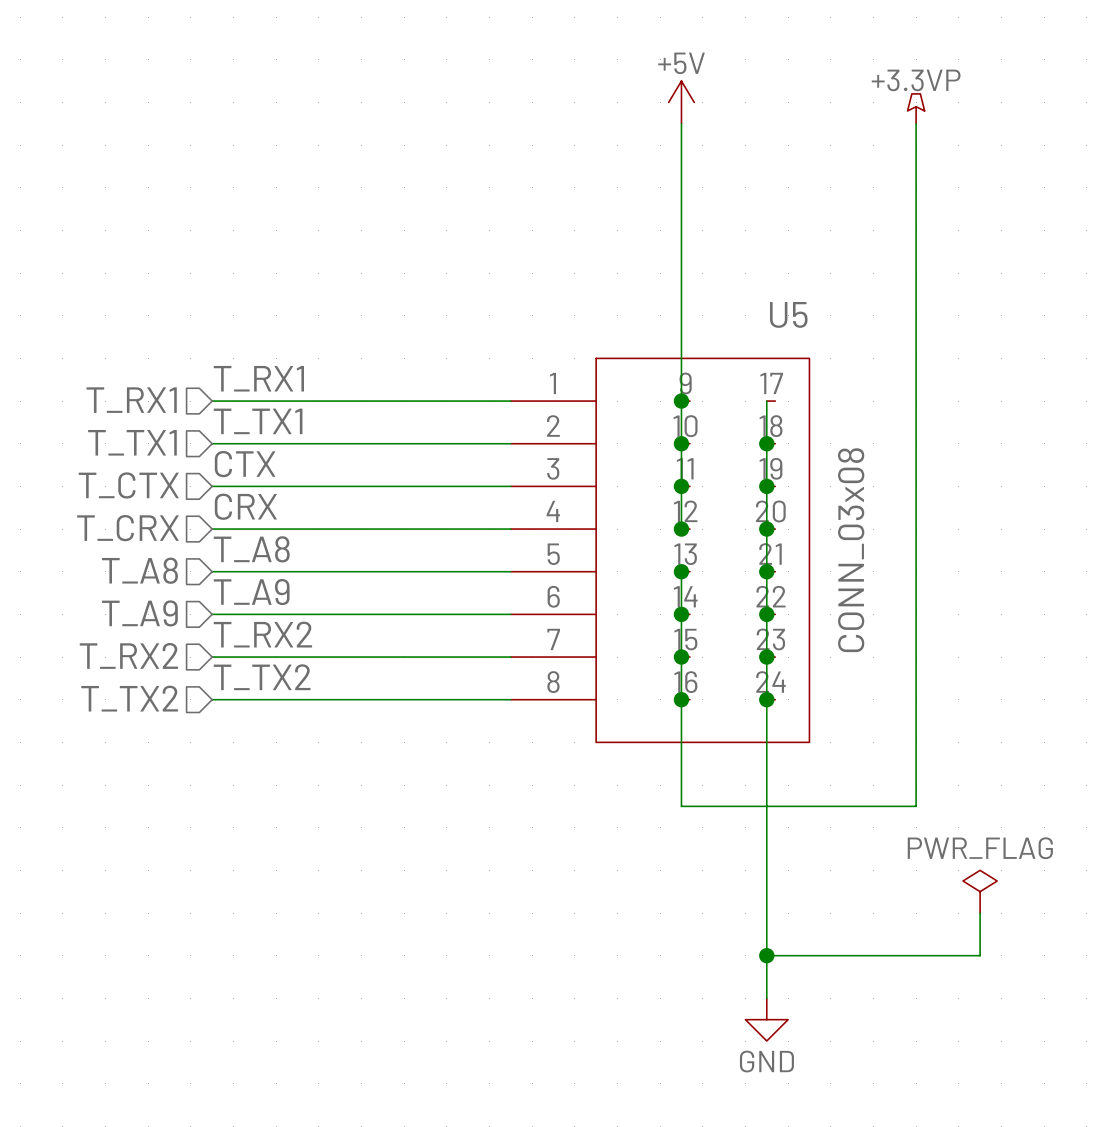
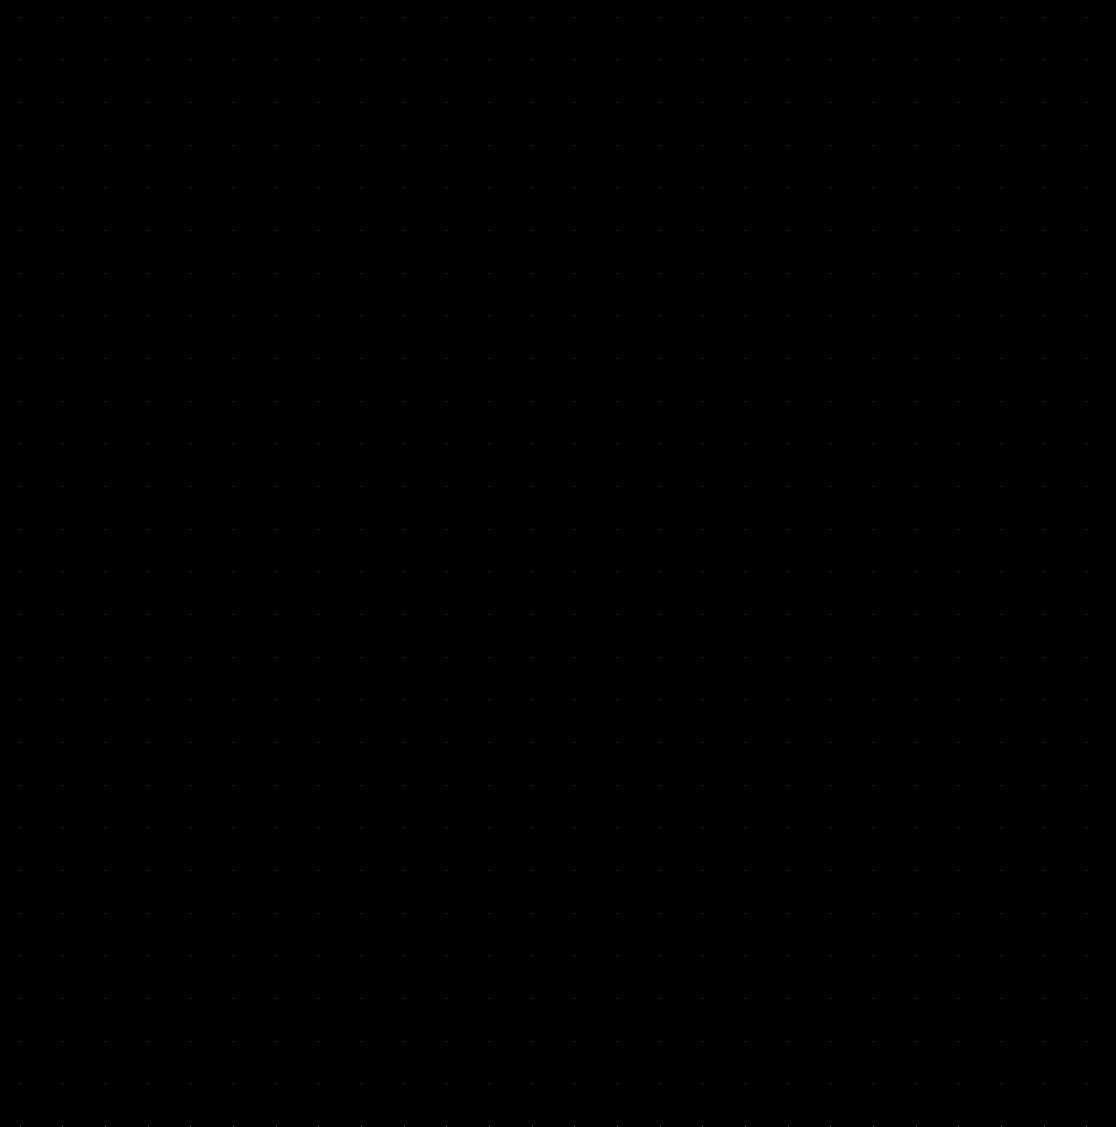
power symbol: +5V (681, 102) -> none
power symbol: +3.3VP (916, 108) -> none
wire: (681, 123) (681, 529) -> none
wire: (916, 123) (916, 806) (681, 806) (681, 571) -> none
label: T_RX1 (258, 378) -> none
hierarchical label: T_RX1 (131, 400) -> none
wire: (212, 401) (510, 401) -> none
junction: (681, 401) -> none
wire: (766, 401) (766, 998) -> none
label: T_TX1 (258, 421) -> none
hierarchical label: T_TX1 (132, 442) -> none
wire: (212, 443) (510, 443) -> none
junction: (681, 443) -> none
junction: (766, 443) -> none
label: CTX (245, 464) -> none
hierarchical label: T_CTX (128, 485) -> none
wire: (212, 486) (510, 486) -> none
junction: (681, 486) -> none
junction: (766, 486) -> none
label: CRX (245, 506) -> none
hierarchical label: T_CRX (127, 528) -> none
wire: (212, 529) (510, 529) -> none
junction: (681, 529) -> none
junction: (766, 529) -> none
label: T_A8 (251, 549) -> none
U5: CONN_03x08 (660, 550) -> none
hierarchical label: T_A8 (139, 570) -> none
wire: (212, 571) (510, 571) -> none
junction: (681, 571) -> none
junction: (766, 571) -> none
label: T_A9 (251, 592) -> none
hierarchical label: T_A9 (139, 613) -> none
wire: (212, 614) (510, 614) -> none
junction: (681, 614) -> none
junction: (766, 614) -> none
label: T_RX2 (262, 634) -> none
hierarchical label: T_RX2 (128, 655) -> none
wire: (212, 657) (510, 657) -> none
junction: (681, 657) -> none
junction: (766, 657) -> none
label: T_TX2 (262, 677) -> none
hierarchical label: T_TX2 (129, 698) -> none
wire: (212, 699) (510, 699) -> none
junction: (681, 699) -> none
junction: (766, 699) -> none
power symbol: PWR_FLAG (980, 891) -> none
wire: (980, 913) (980, 955) (766, 955) -> none
junction: (766, 955) -> none
power symbol: GND (766, 1019) -> none

